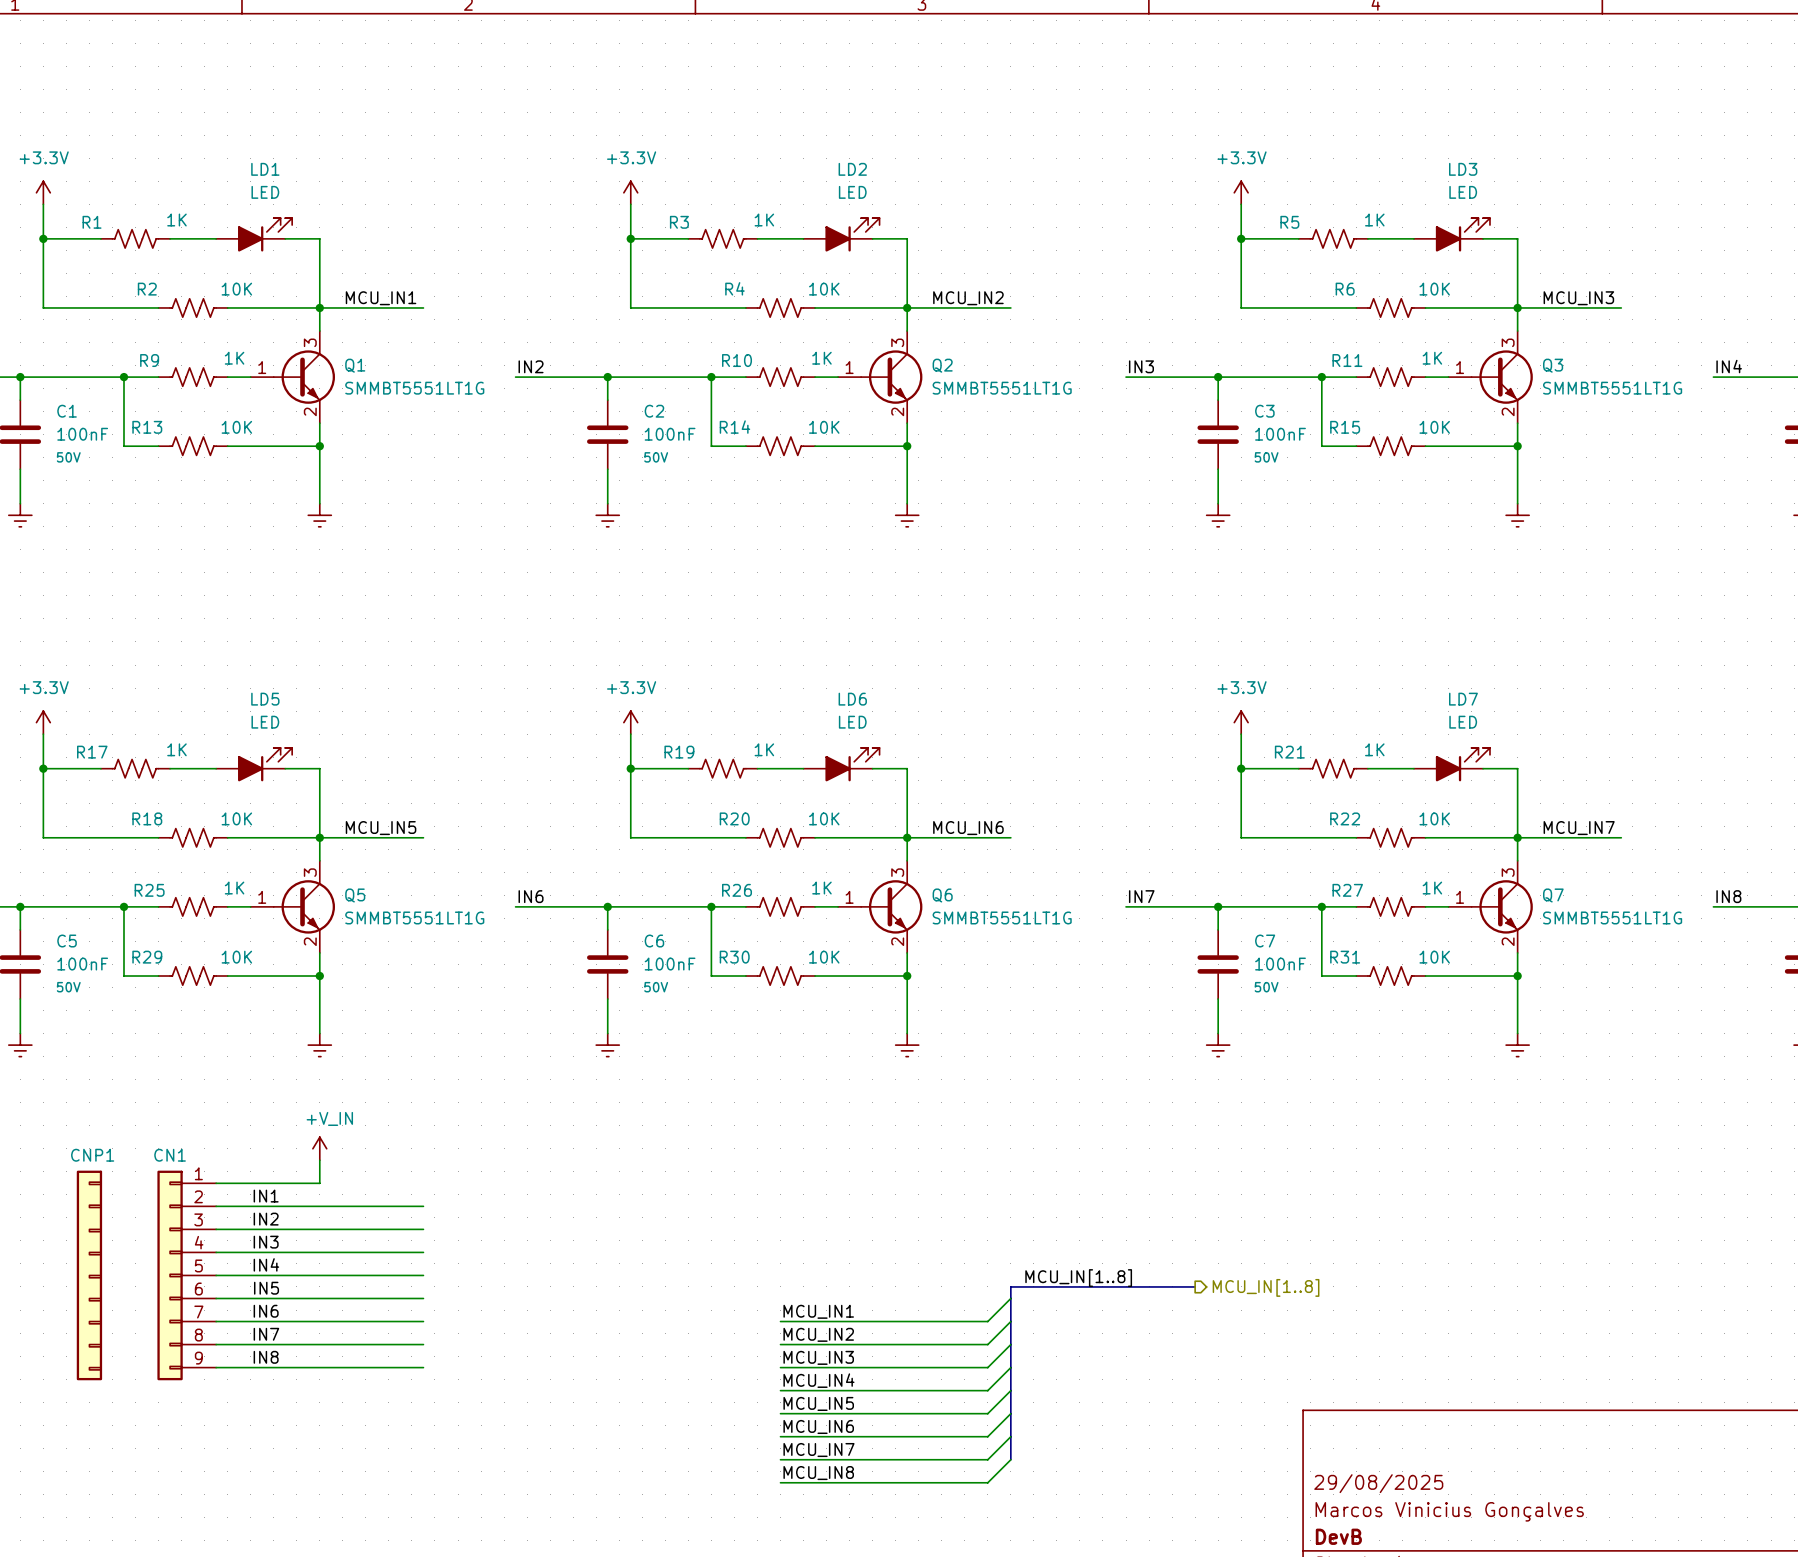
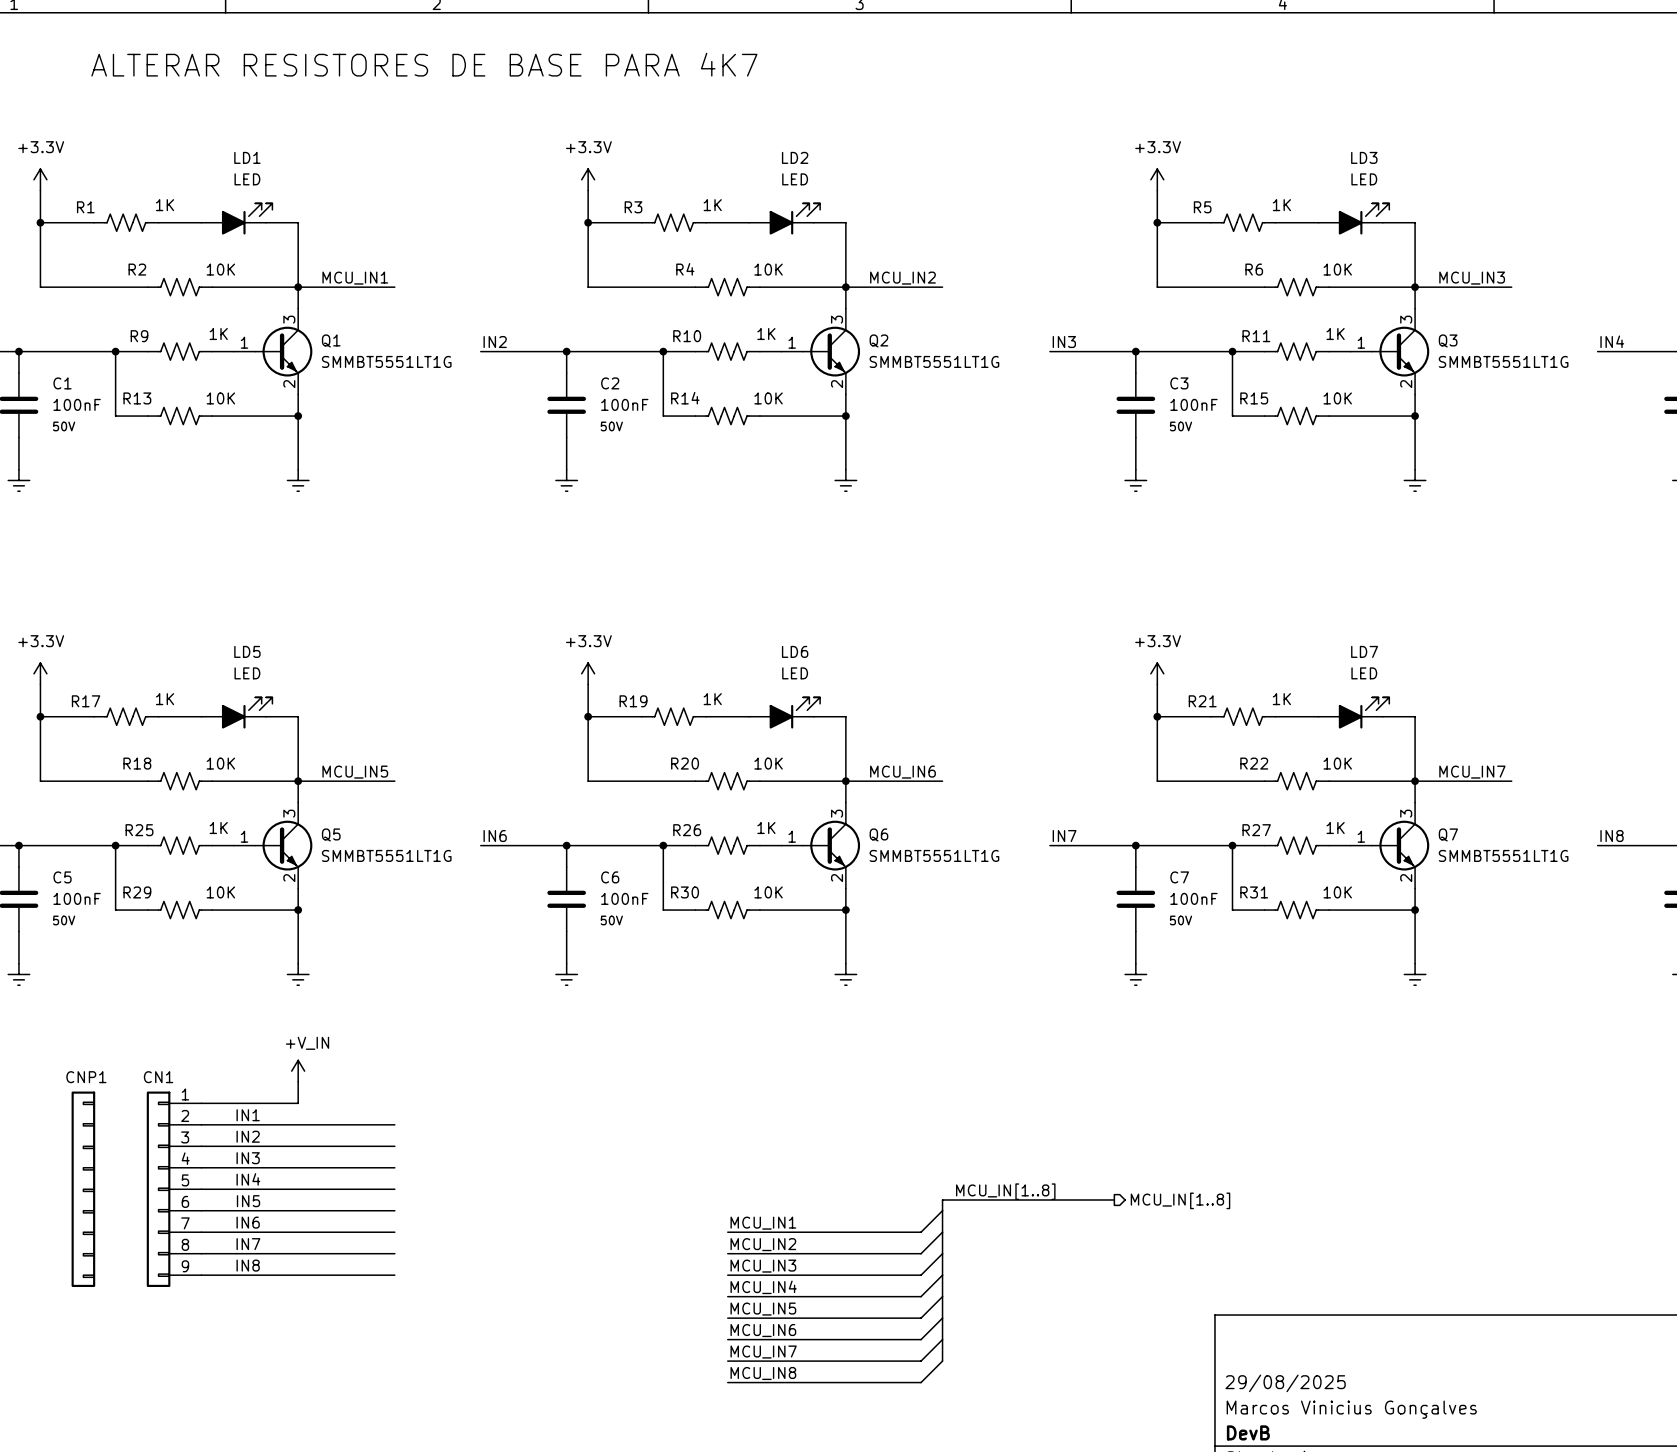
text: none -> ALTERAR RESISTORES DE BASE PARA 4K7 (424, 64)

